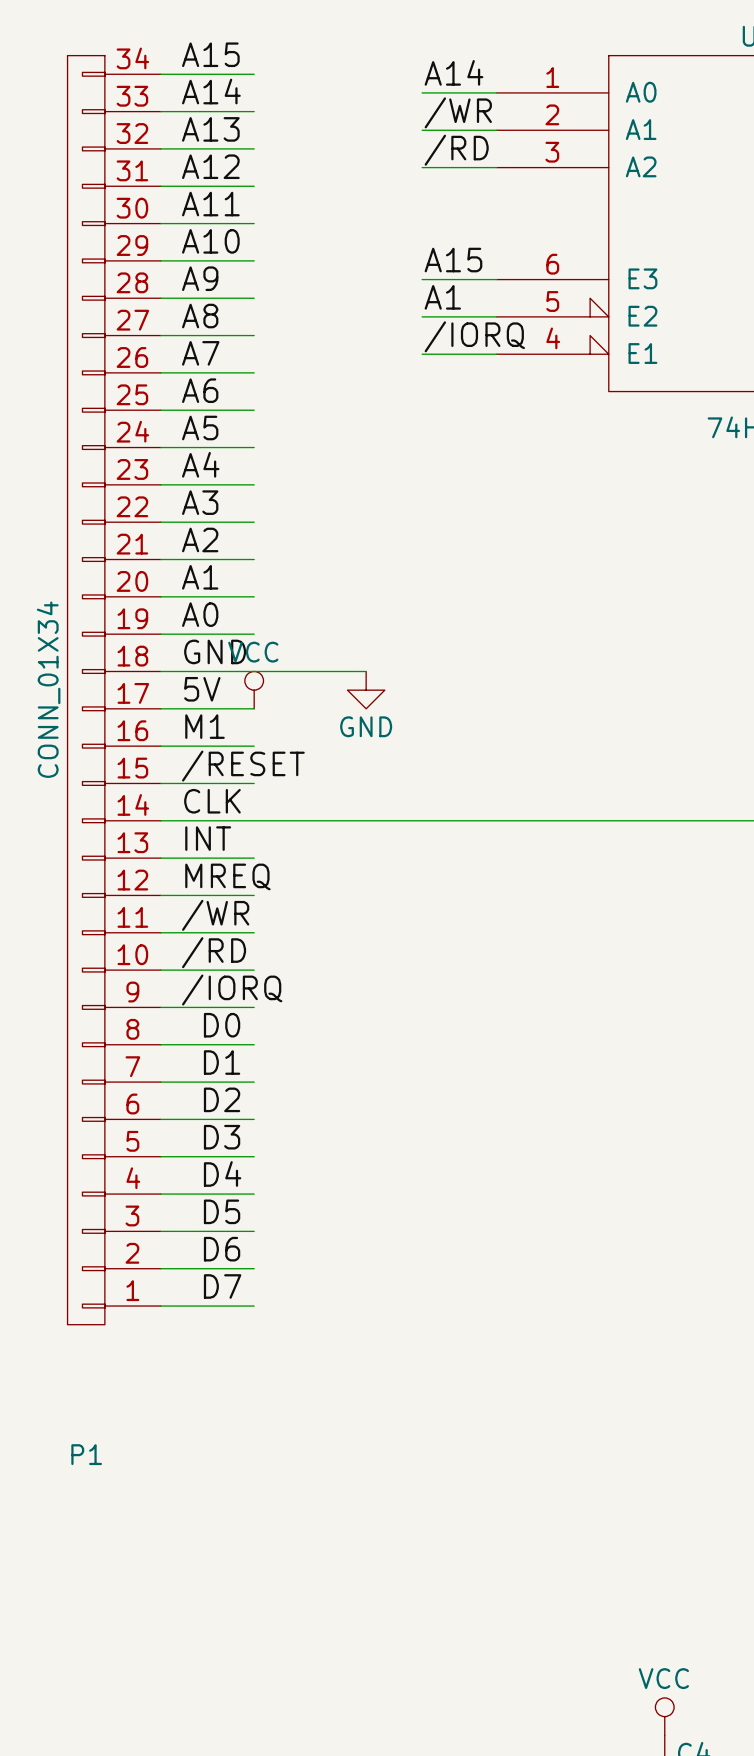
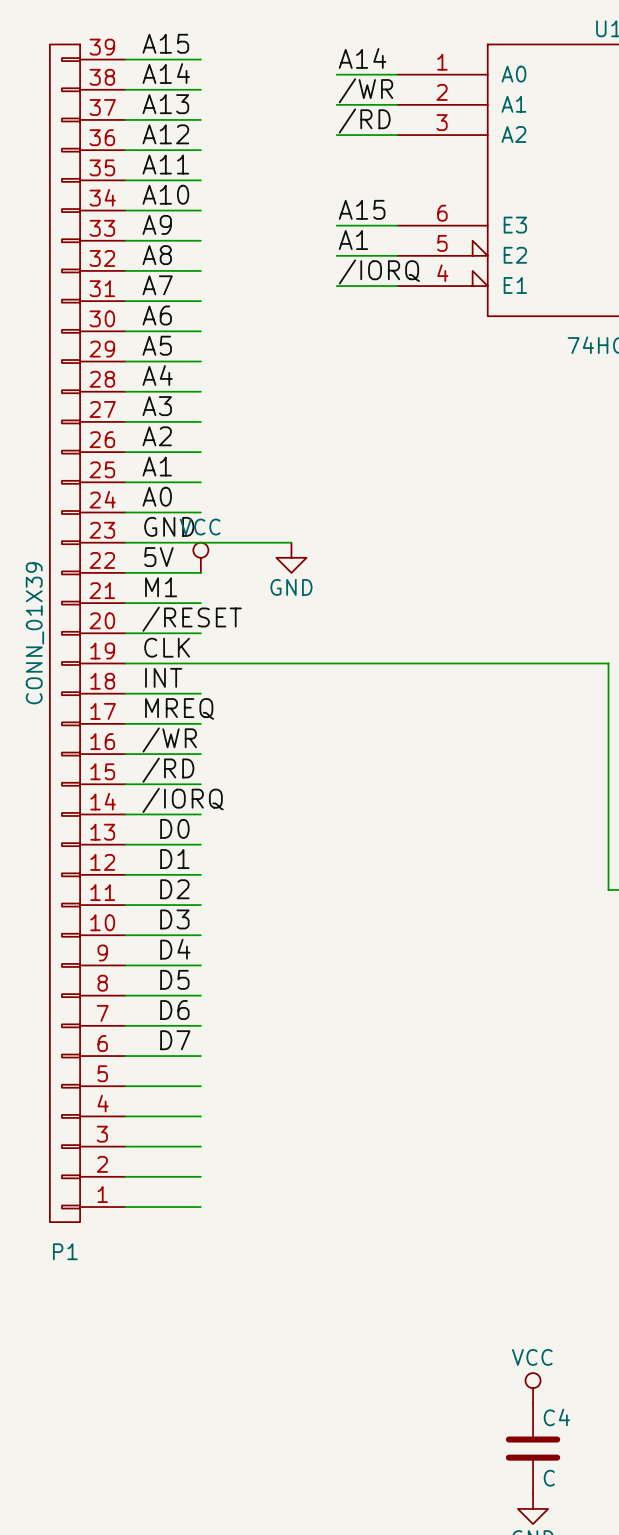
P1 symbol: [67, 55, 161, 1325] -> [49, 44, 126, 1223]
P1 value: CONN_01X34 (48, 689) -> CONN_01X39 (34, 633)
wire: none -> (125, 1086) (200, 1086)
wire: none -> (125, 1116) (200, 1116)
wire: none -> (125, 1146) (200, 1146)
wire: none -> (125, 1176) (200, 1176)
wire: none -> (125, 1207) (200, 1207)

